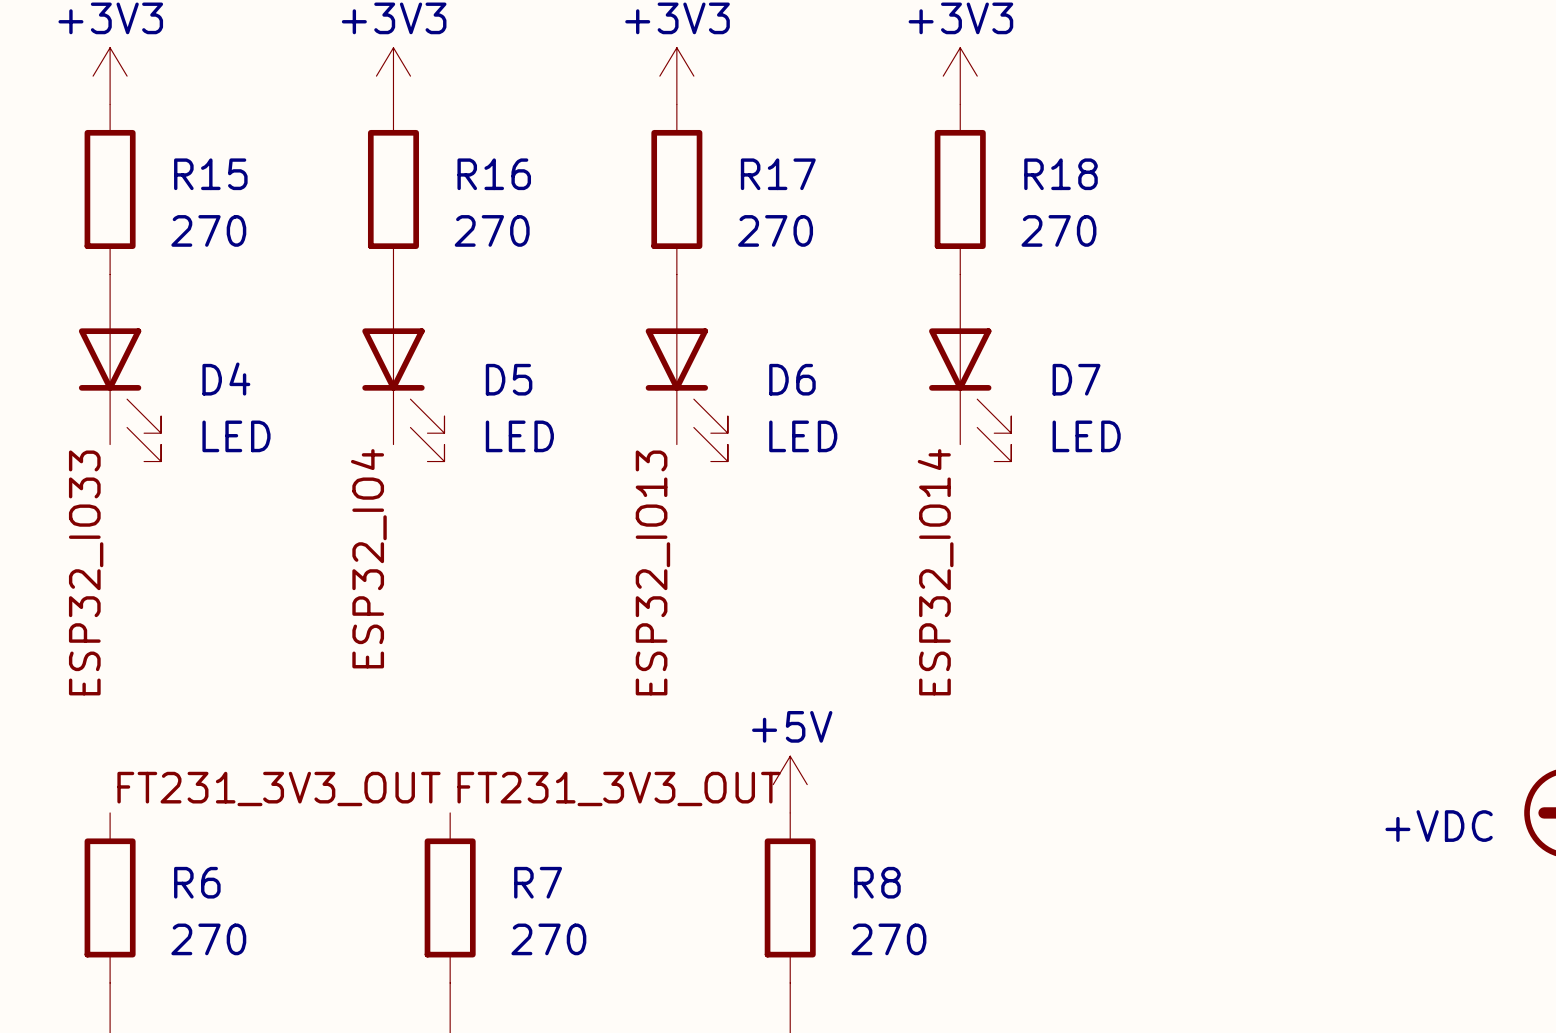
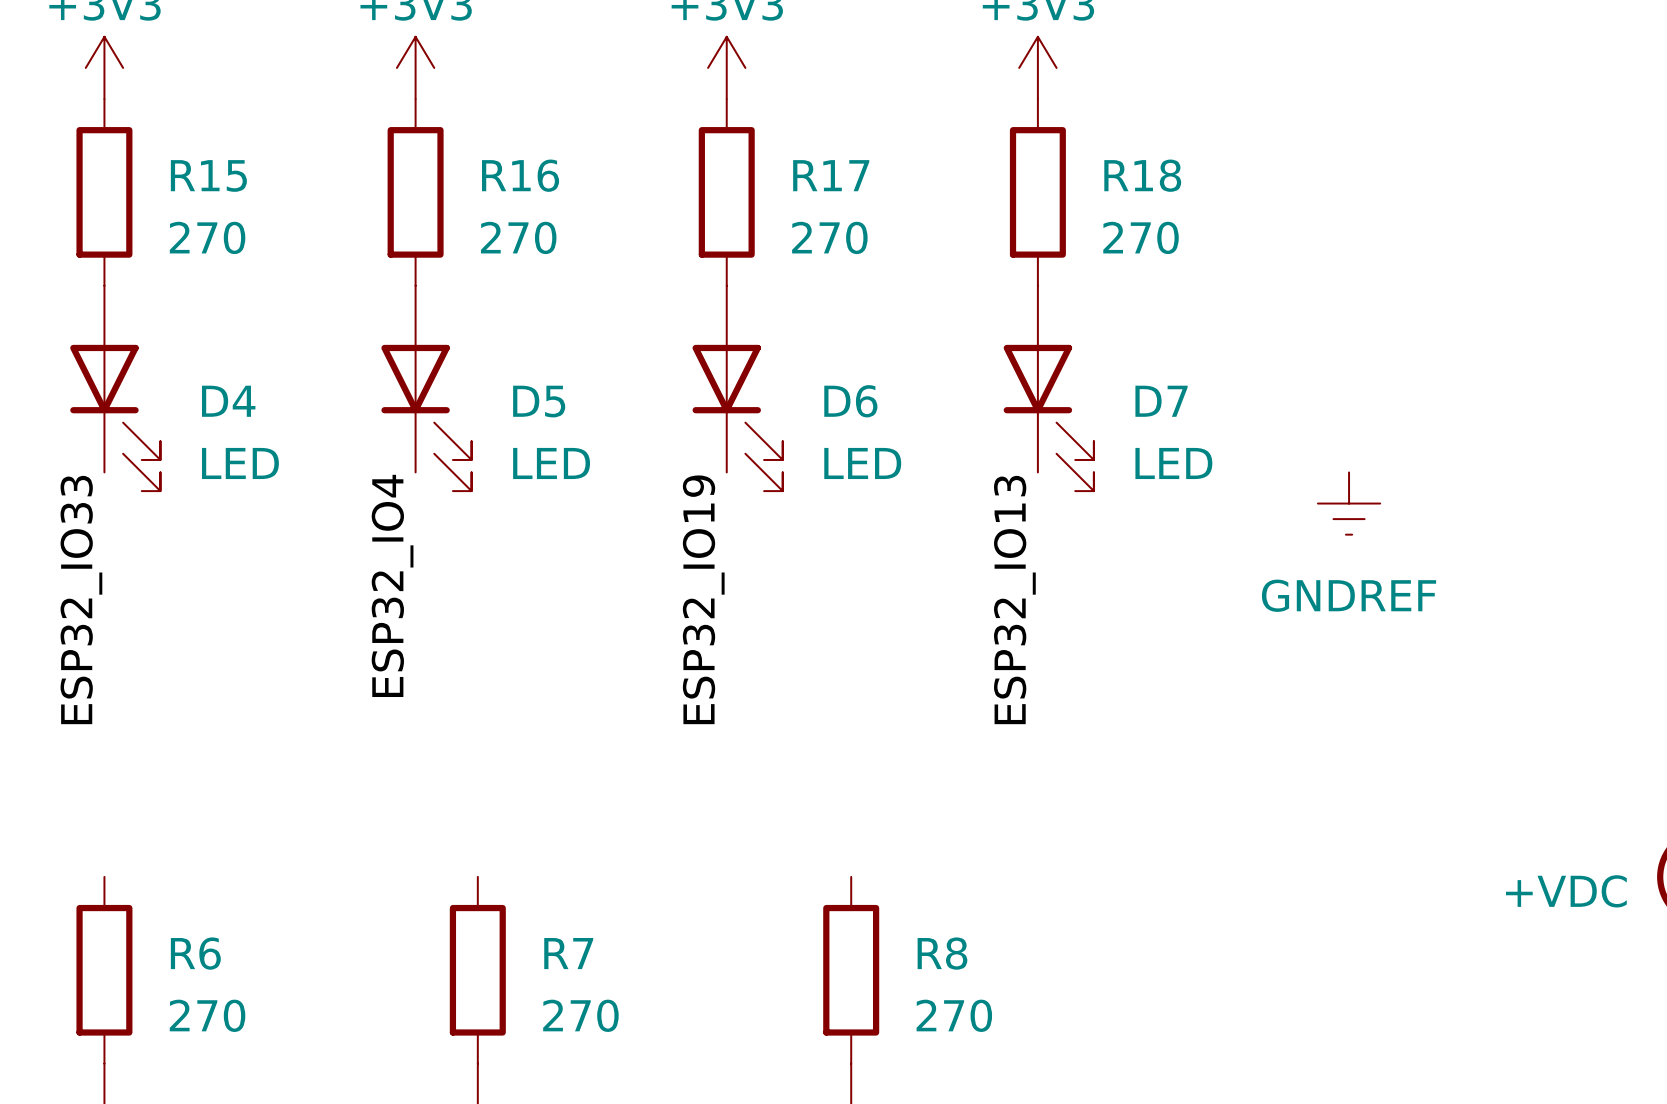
power symbol: none -> GNDREF (1349, 503)
label: ESP32_IO13 (652, 572) -> ESP32_IO19 (703, 599)
label: ESP32_IO14 (935, 572) -> ESP32_IO13 (1014, 600)
power symbol: +5V (790, 784) -> none
label: FT231_3V3_OUT (278, 788) -> none
label: FT231_3V3_OUT (619, 788) -> none

